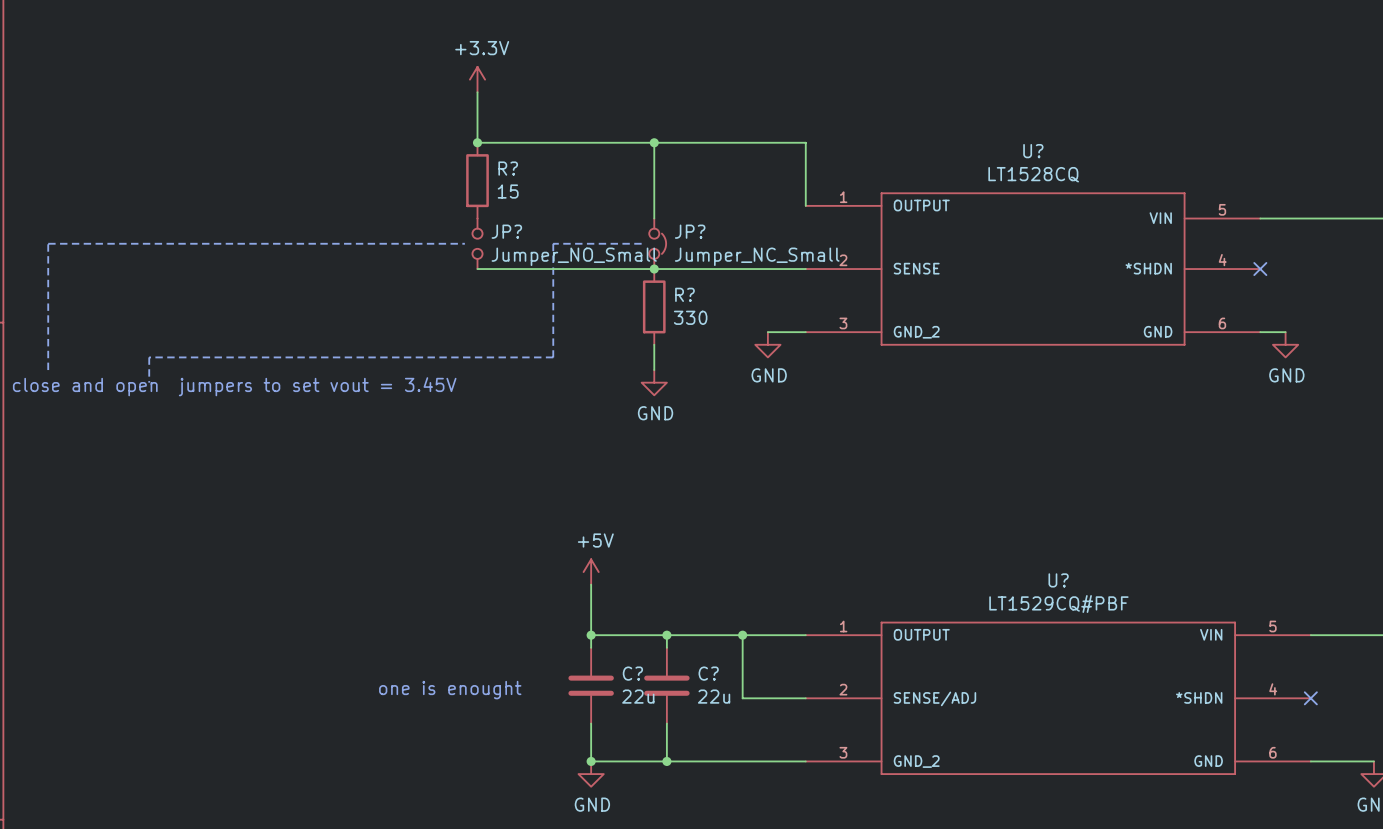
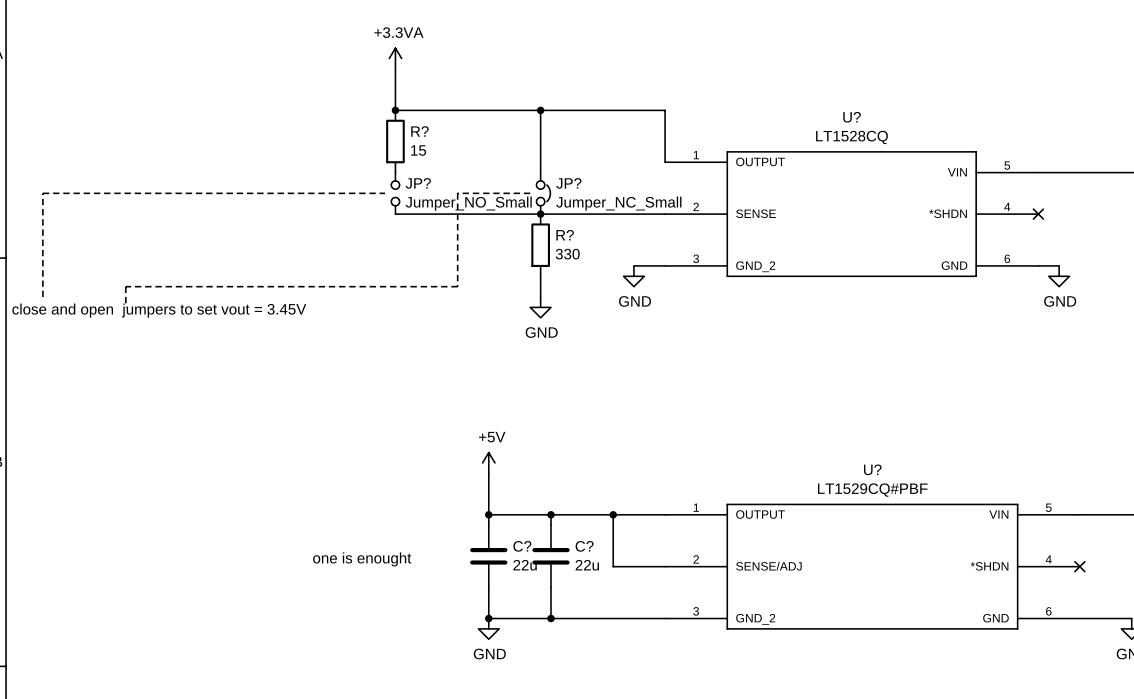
power symbol: +3.3V (477, 79) -> +3.3VA (395, 58)

